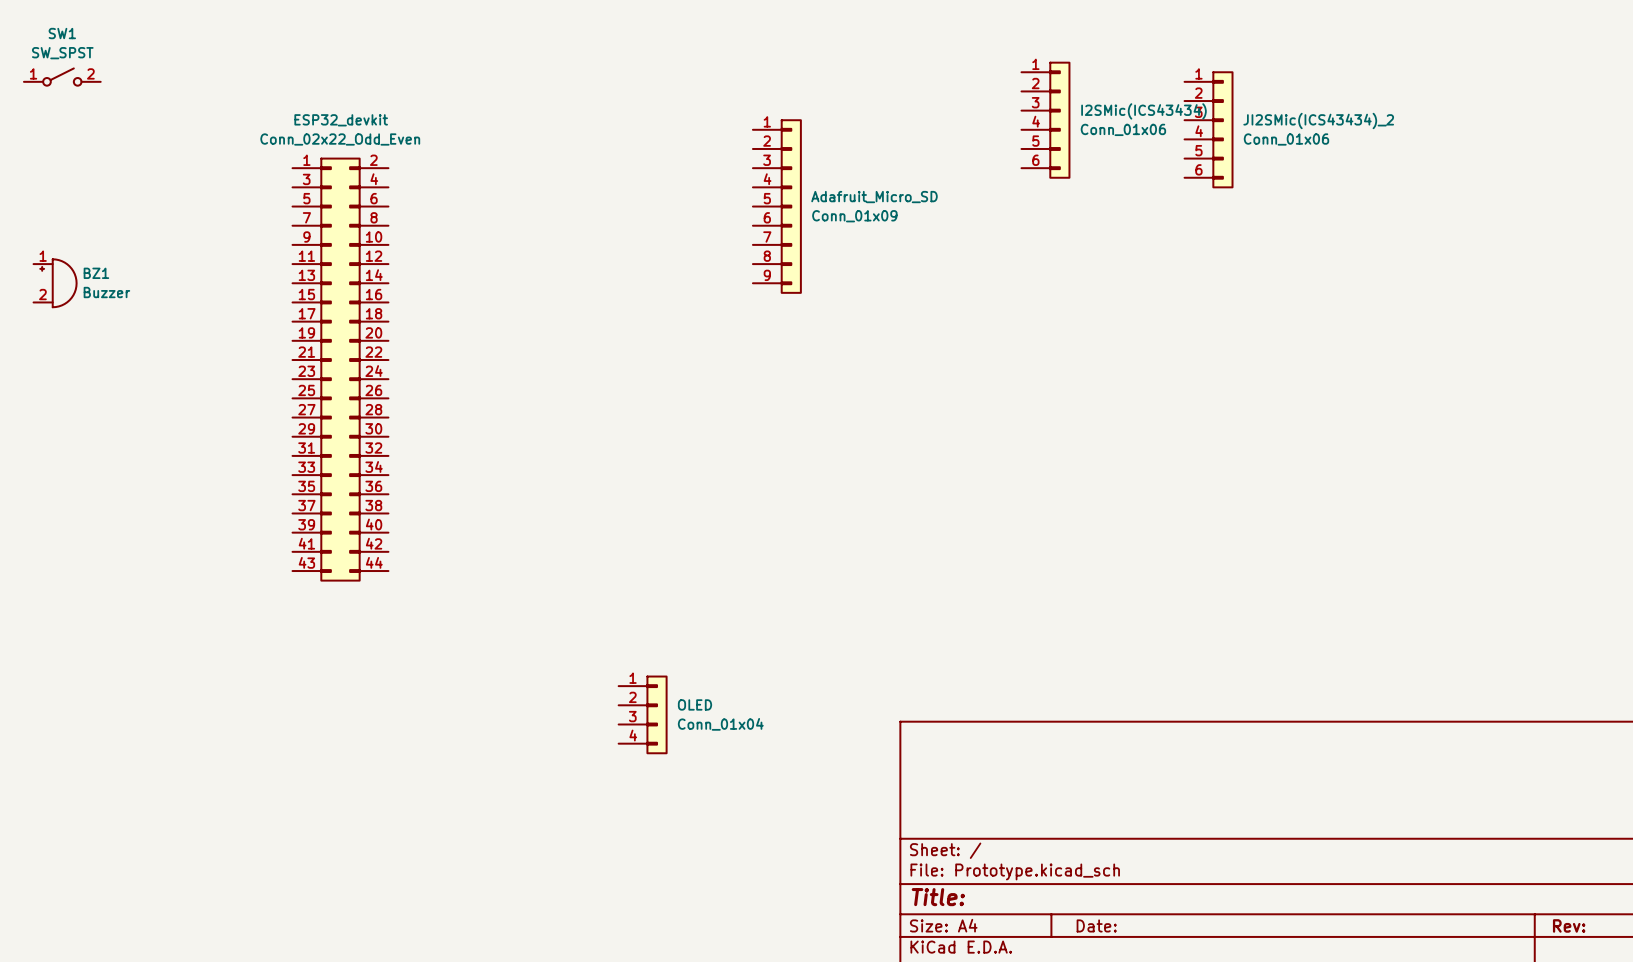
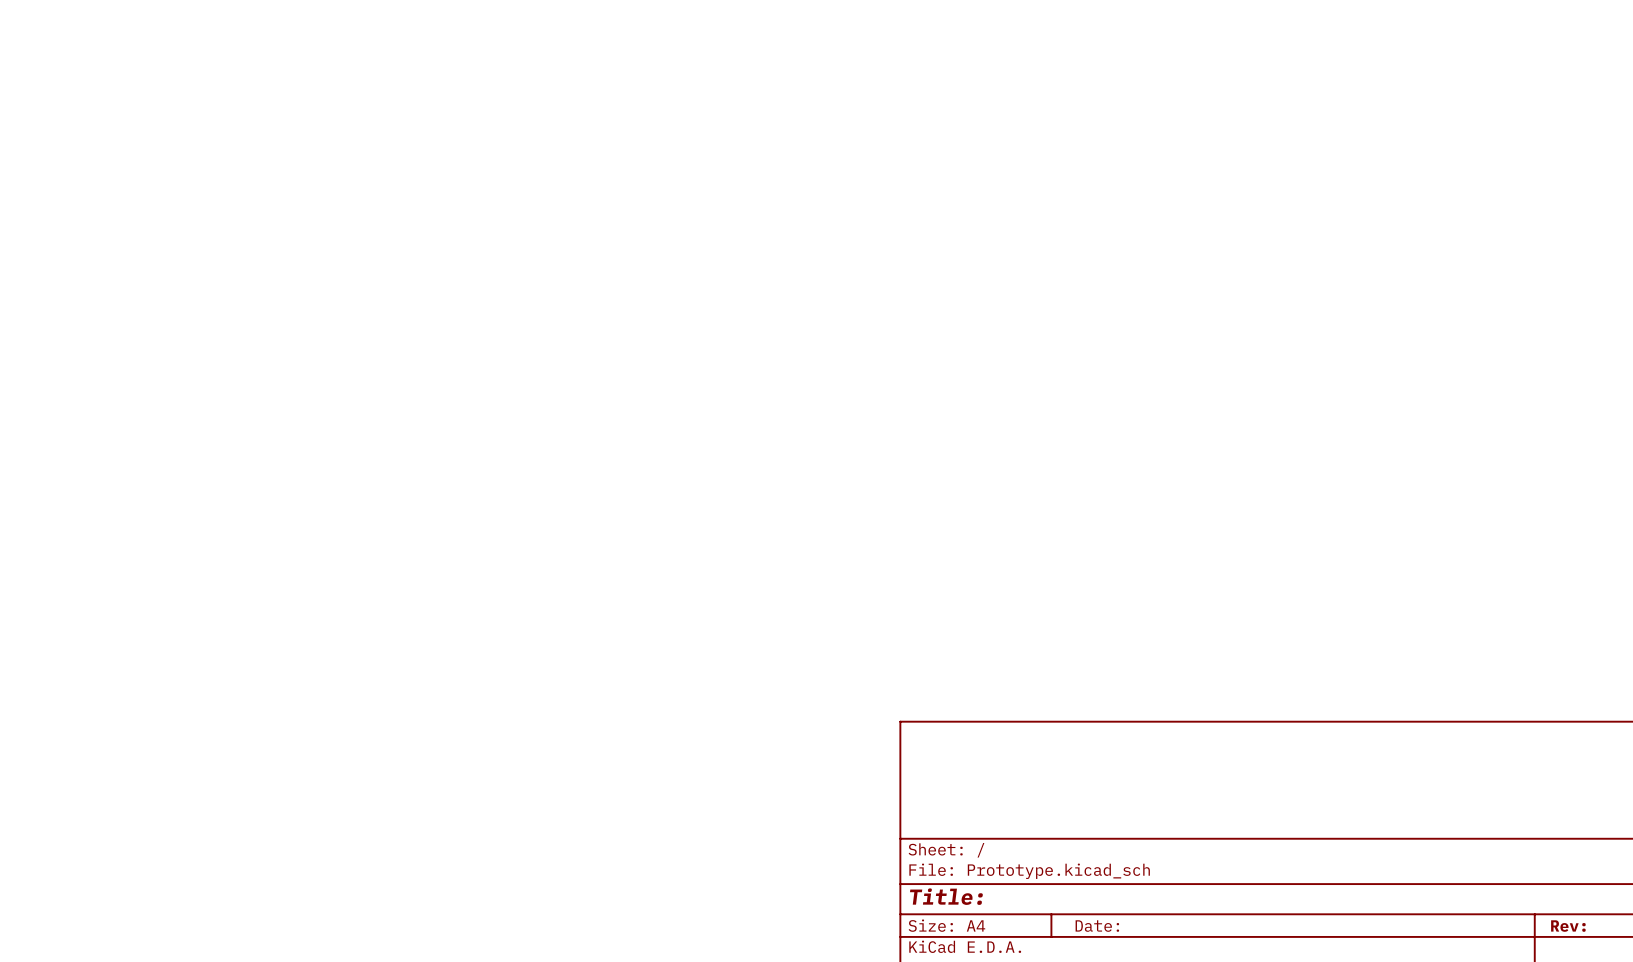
SW1: SW_SPST (62, 77) -> none
I2SMic(ICS43434): Conn_01x06 (1045, 120) -> none
JI2SMic(ICS43434)_2: Conn_01x06 (1209, 129) -> none
Adafruit_Micro_SD: Conn_01x09 (777, 206) -> none
BZ1: Buzzer (55, 283) -> none
ESP32_devkit: Conn_02x22_Odd_Even (340, 369) -> none
OLED: Conn_01x04 (643, 714) -> none

